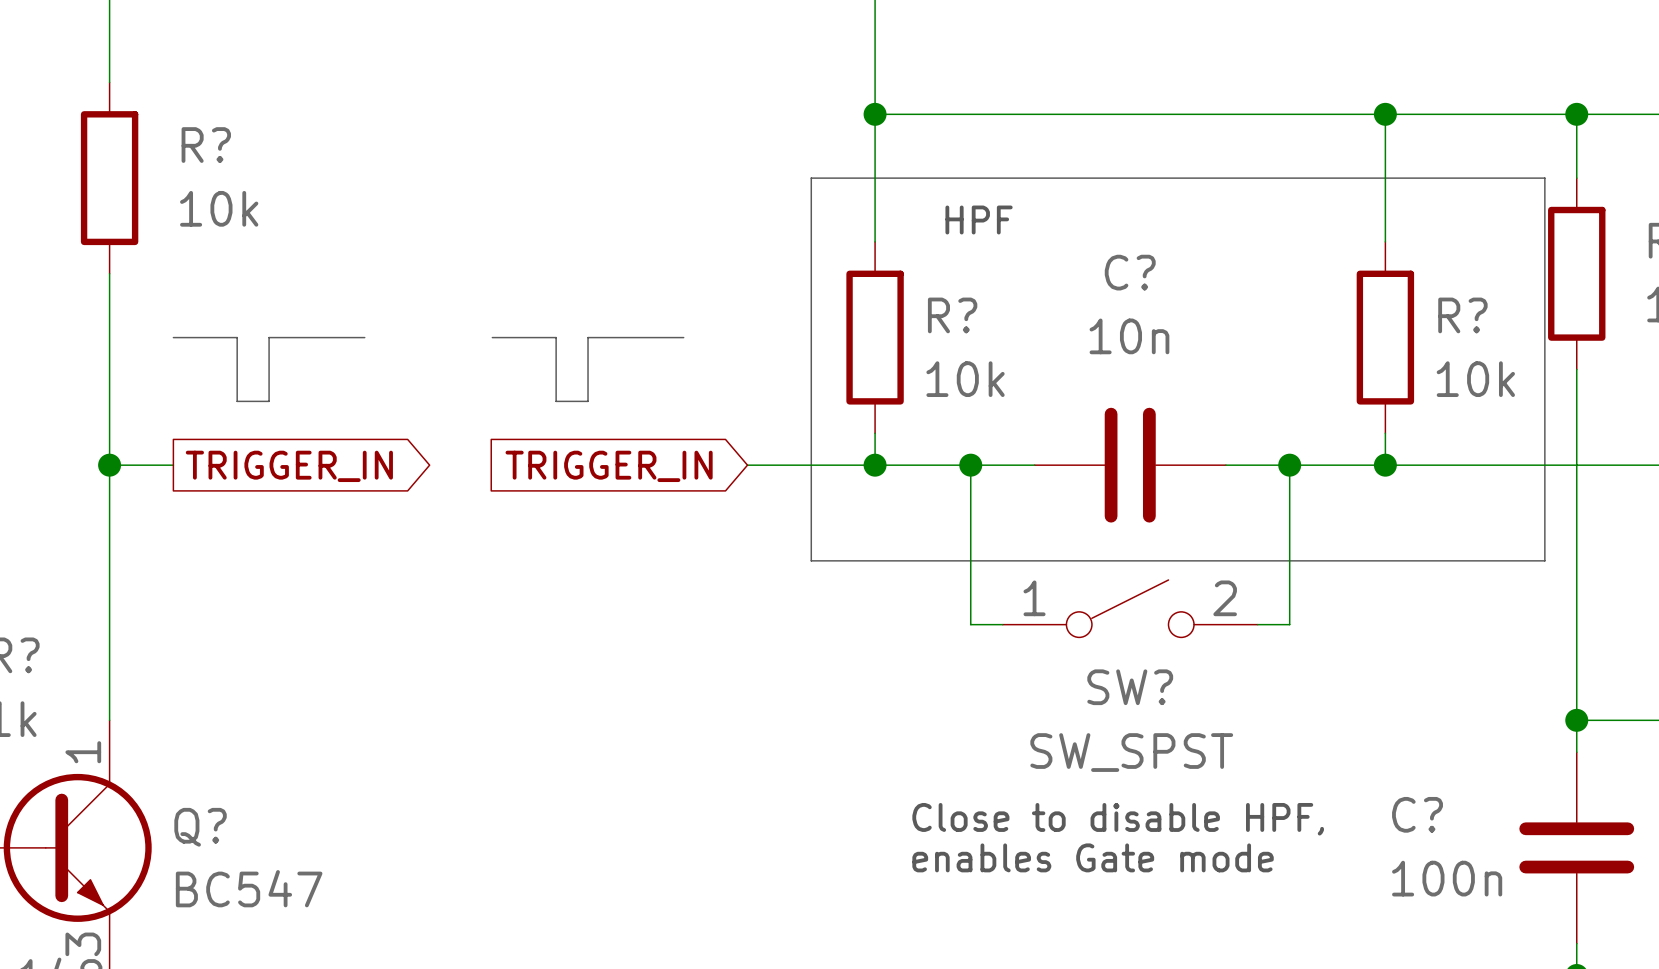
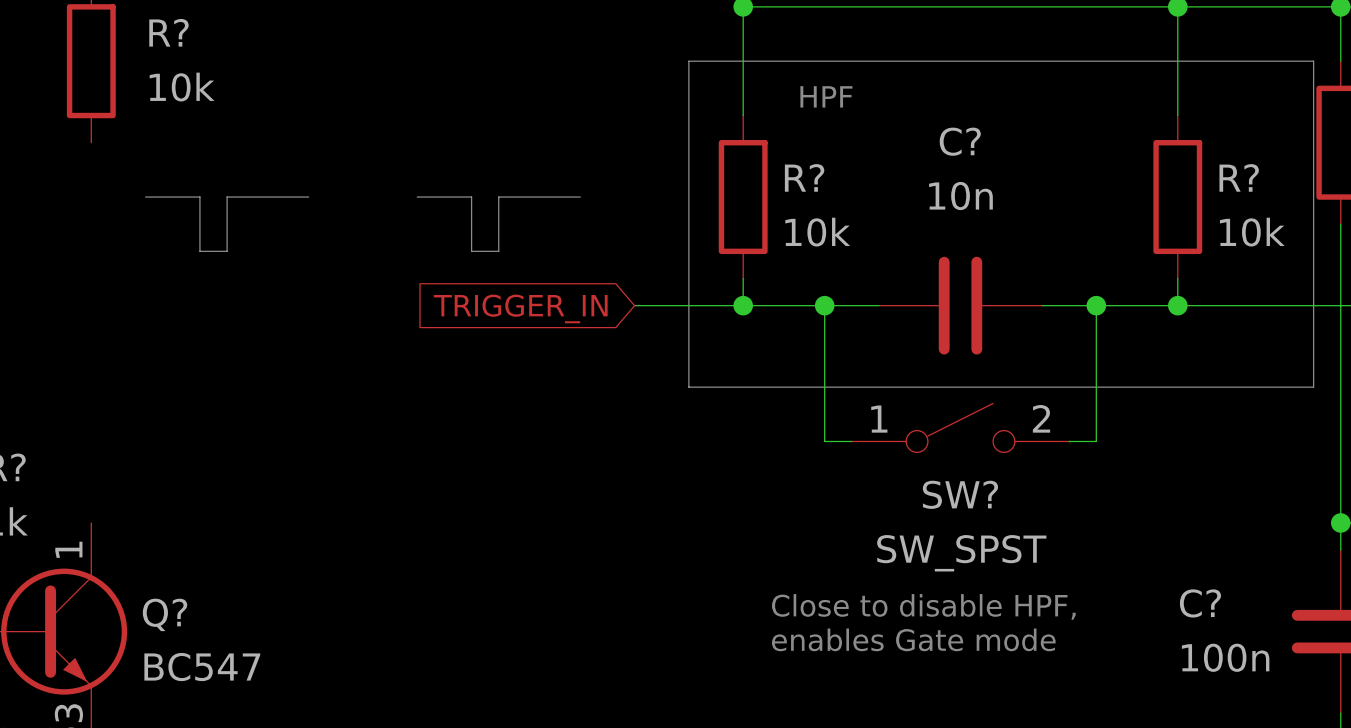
wire: (109, 273) (109, 720) -> none
wire: (109, 465) (173, 465) -> none
junction: (109, 465) -> none
global label: TRIGGER_IN (289, 466) -> none

